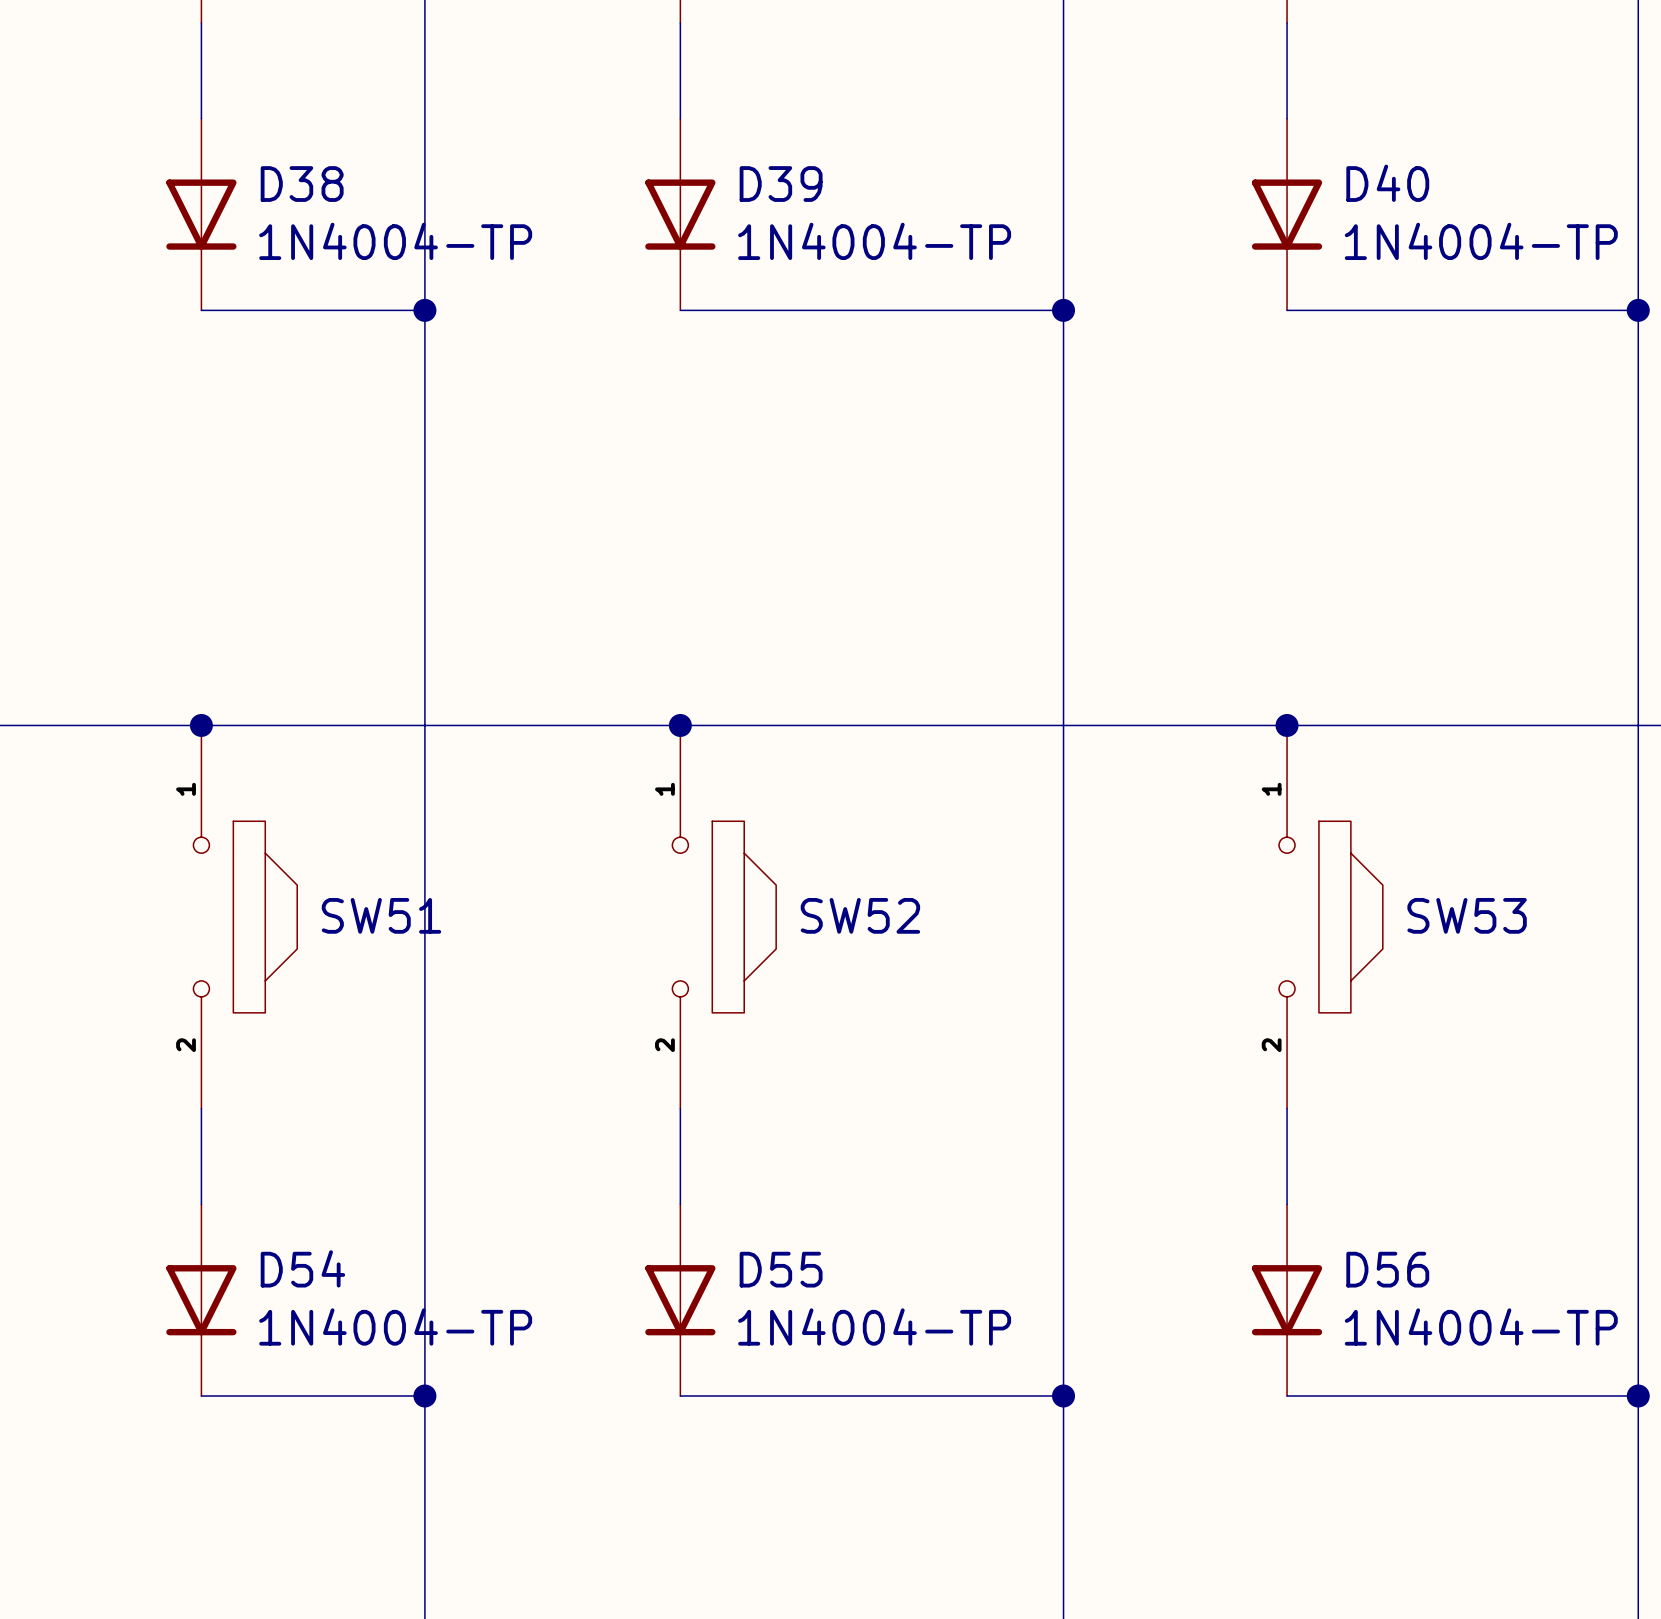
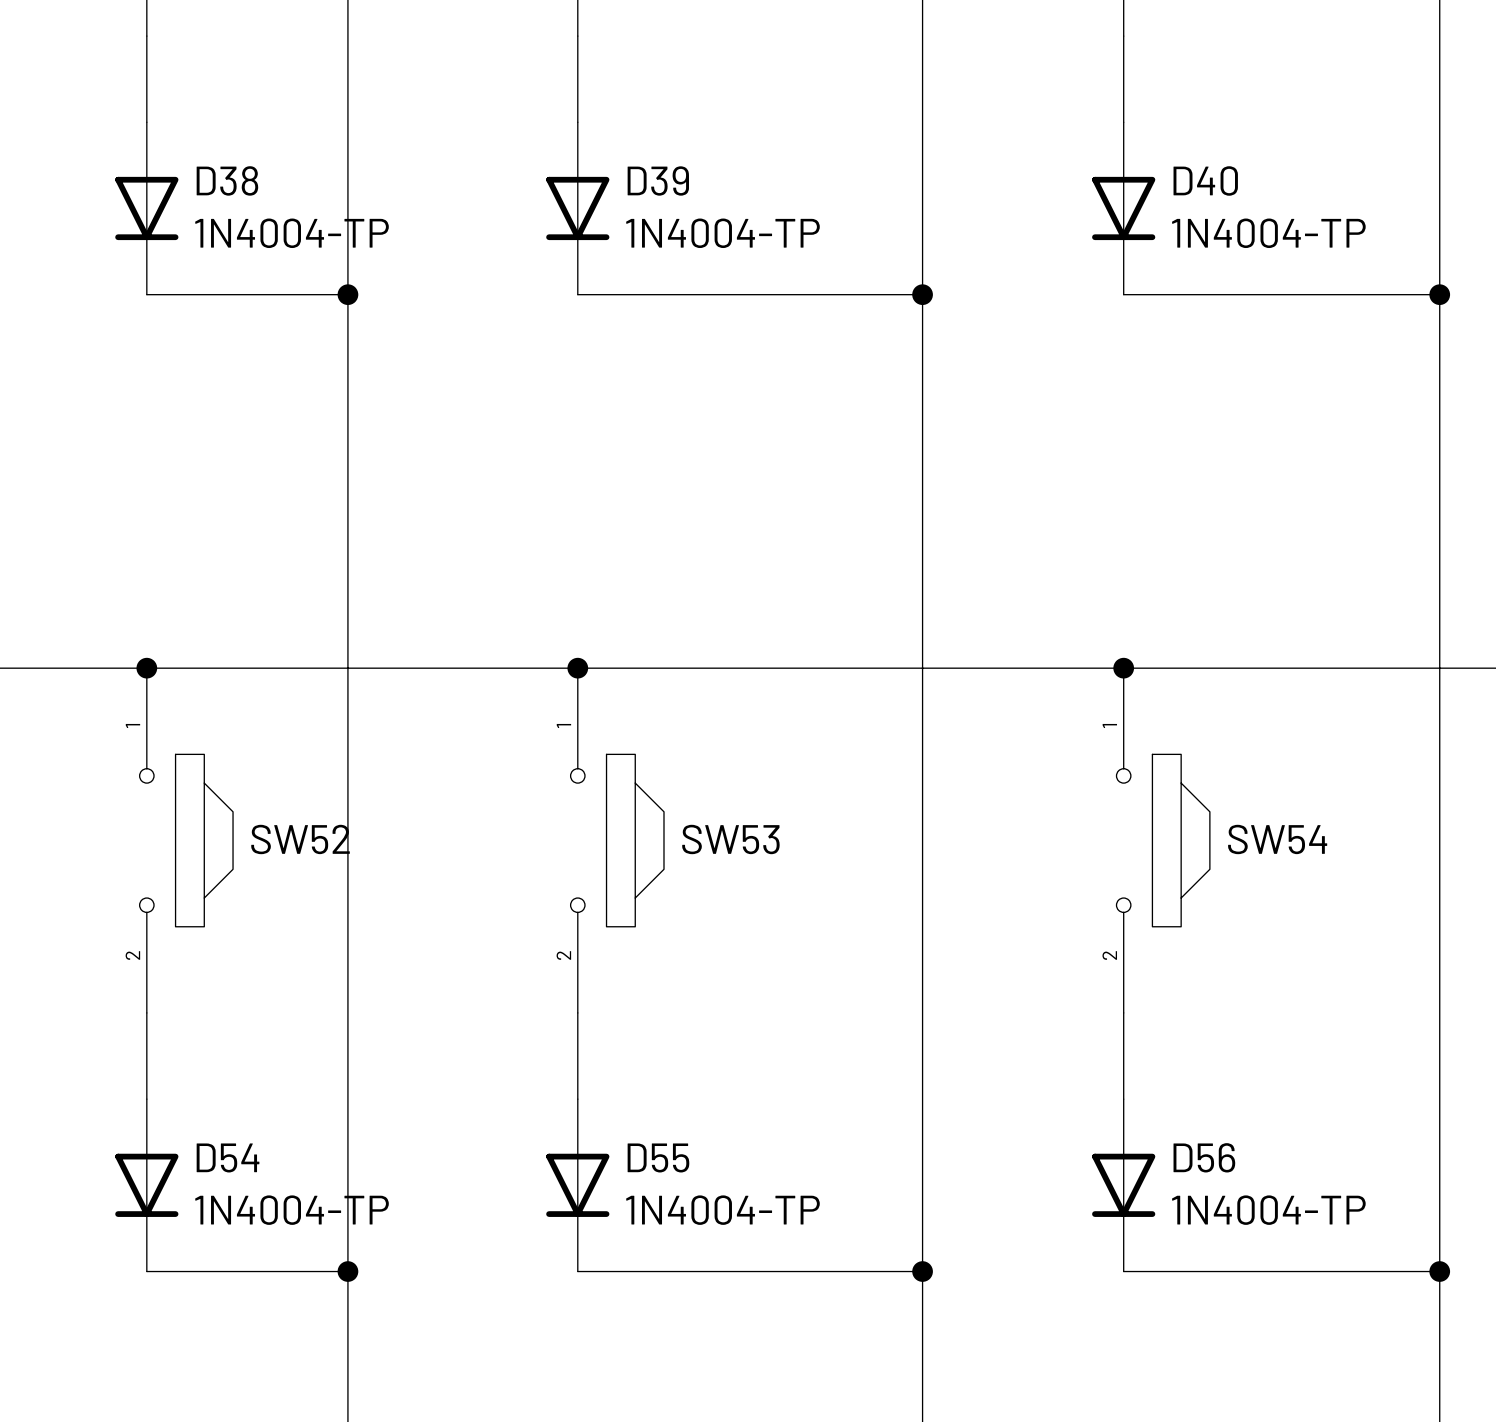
SW51 name: SW51 (381, 915) -> SW52 (300, 839)
SW52 name: SW52 (860, 915) -> SW53 (730, 839)
SW53 name: SW53 (1467, 915) -> SW54 (1277, 839)

